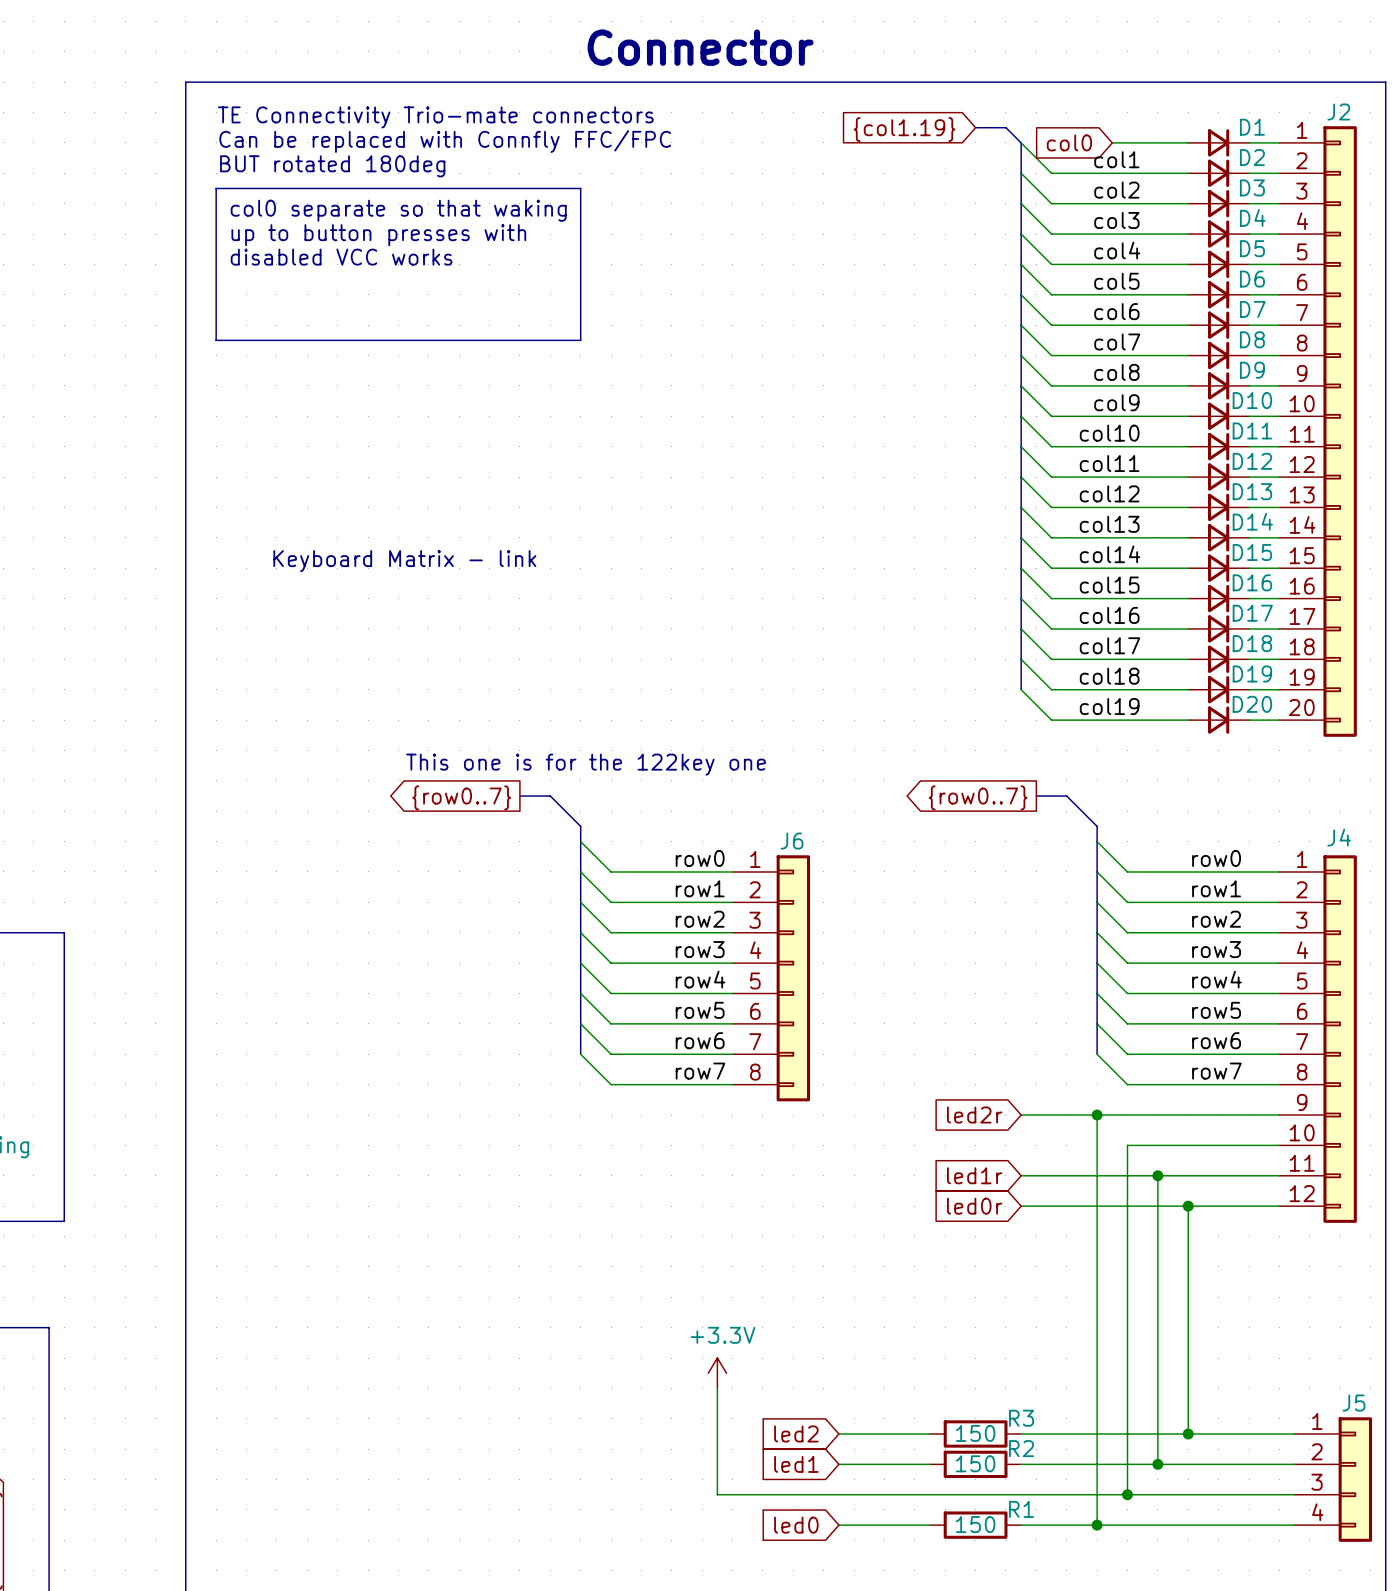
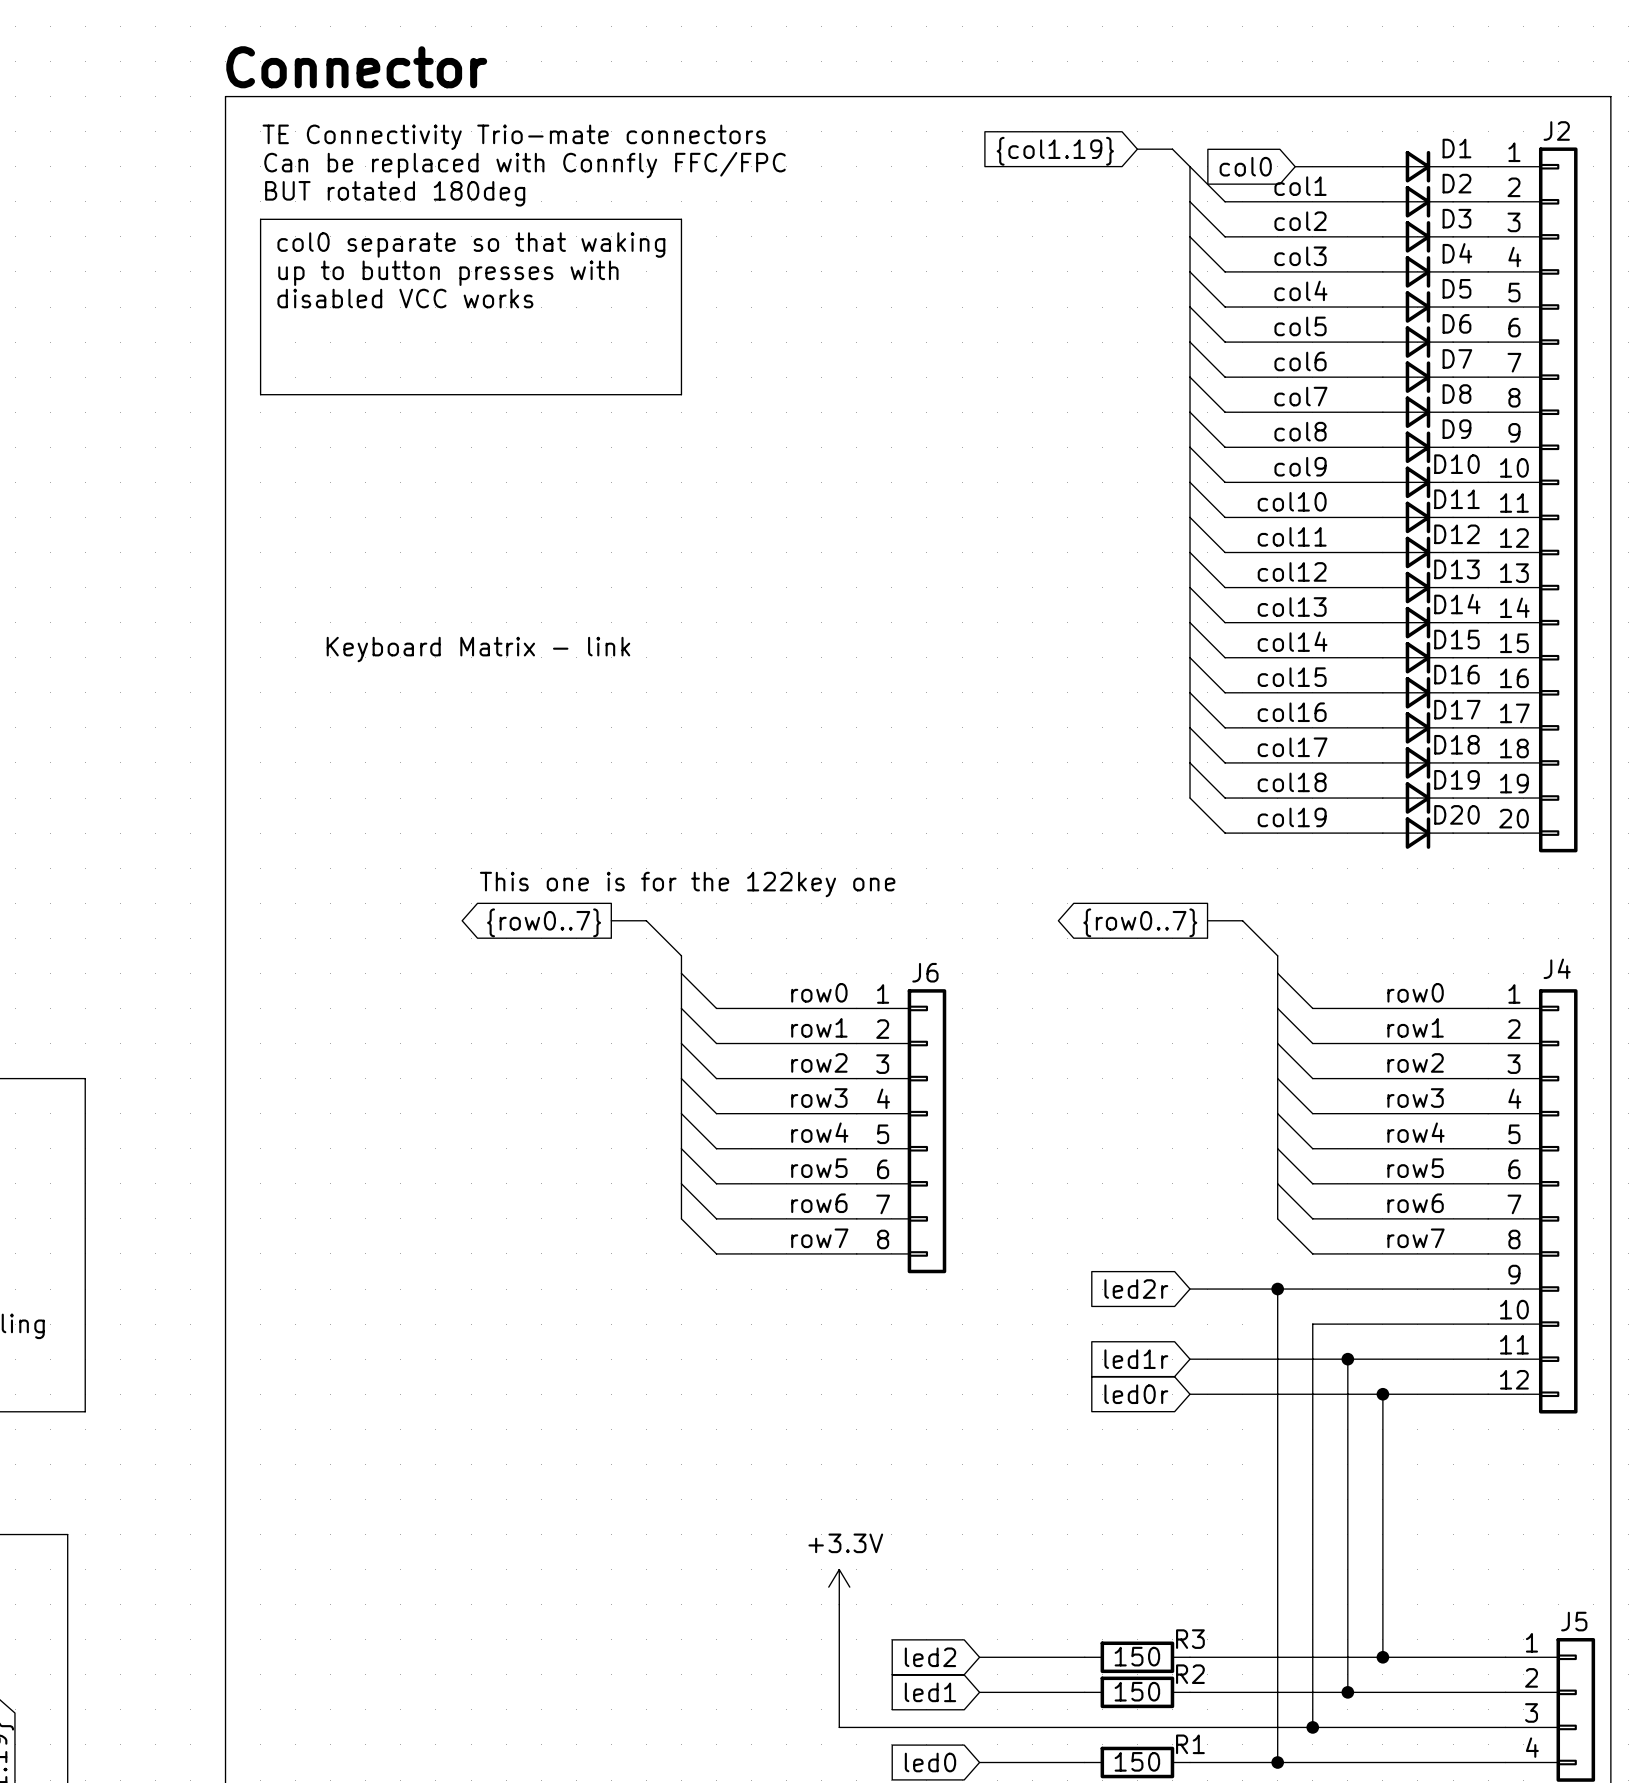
text: Connector (700, 47) -> none
text: none -> Connector (356, 67)

